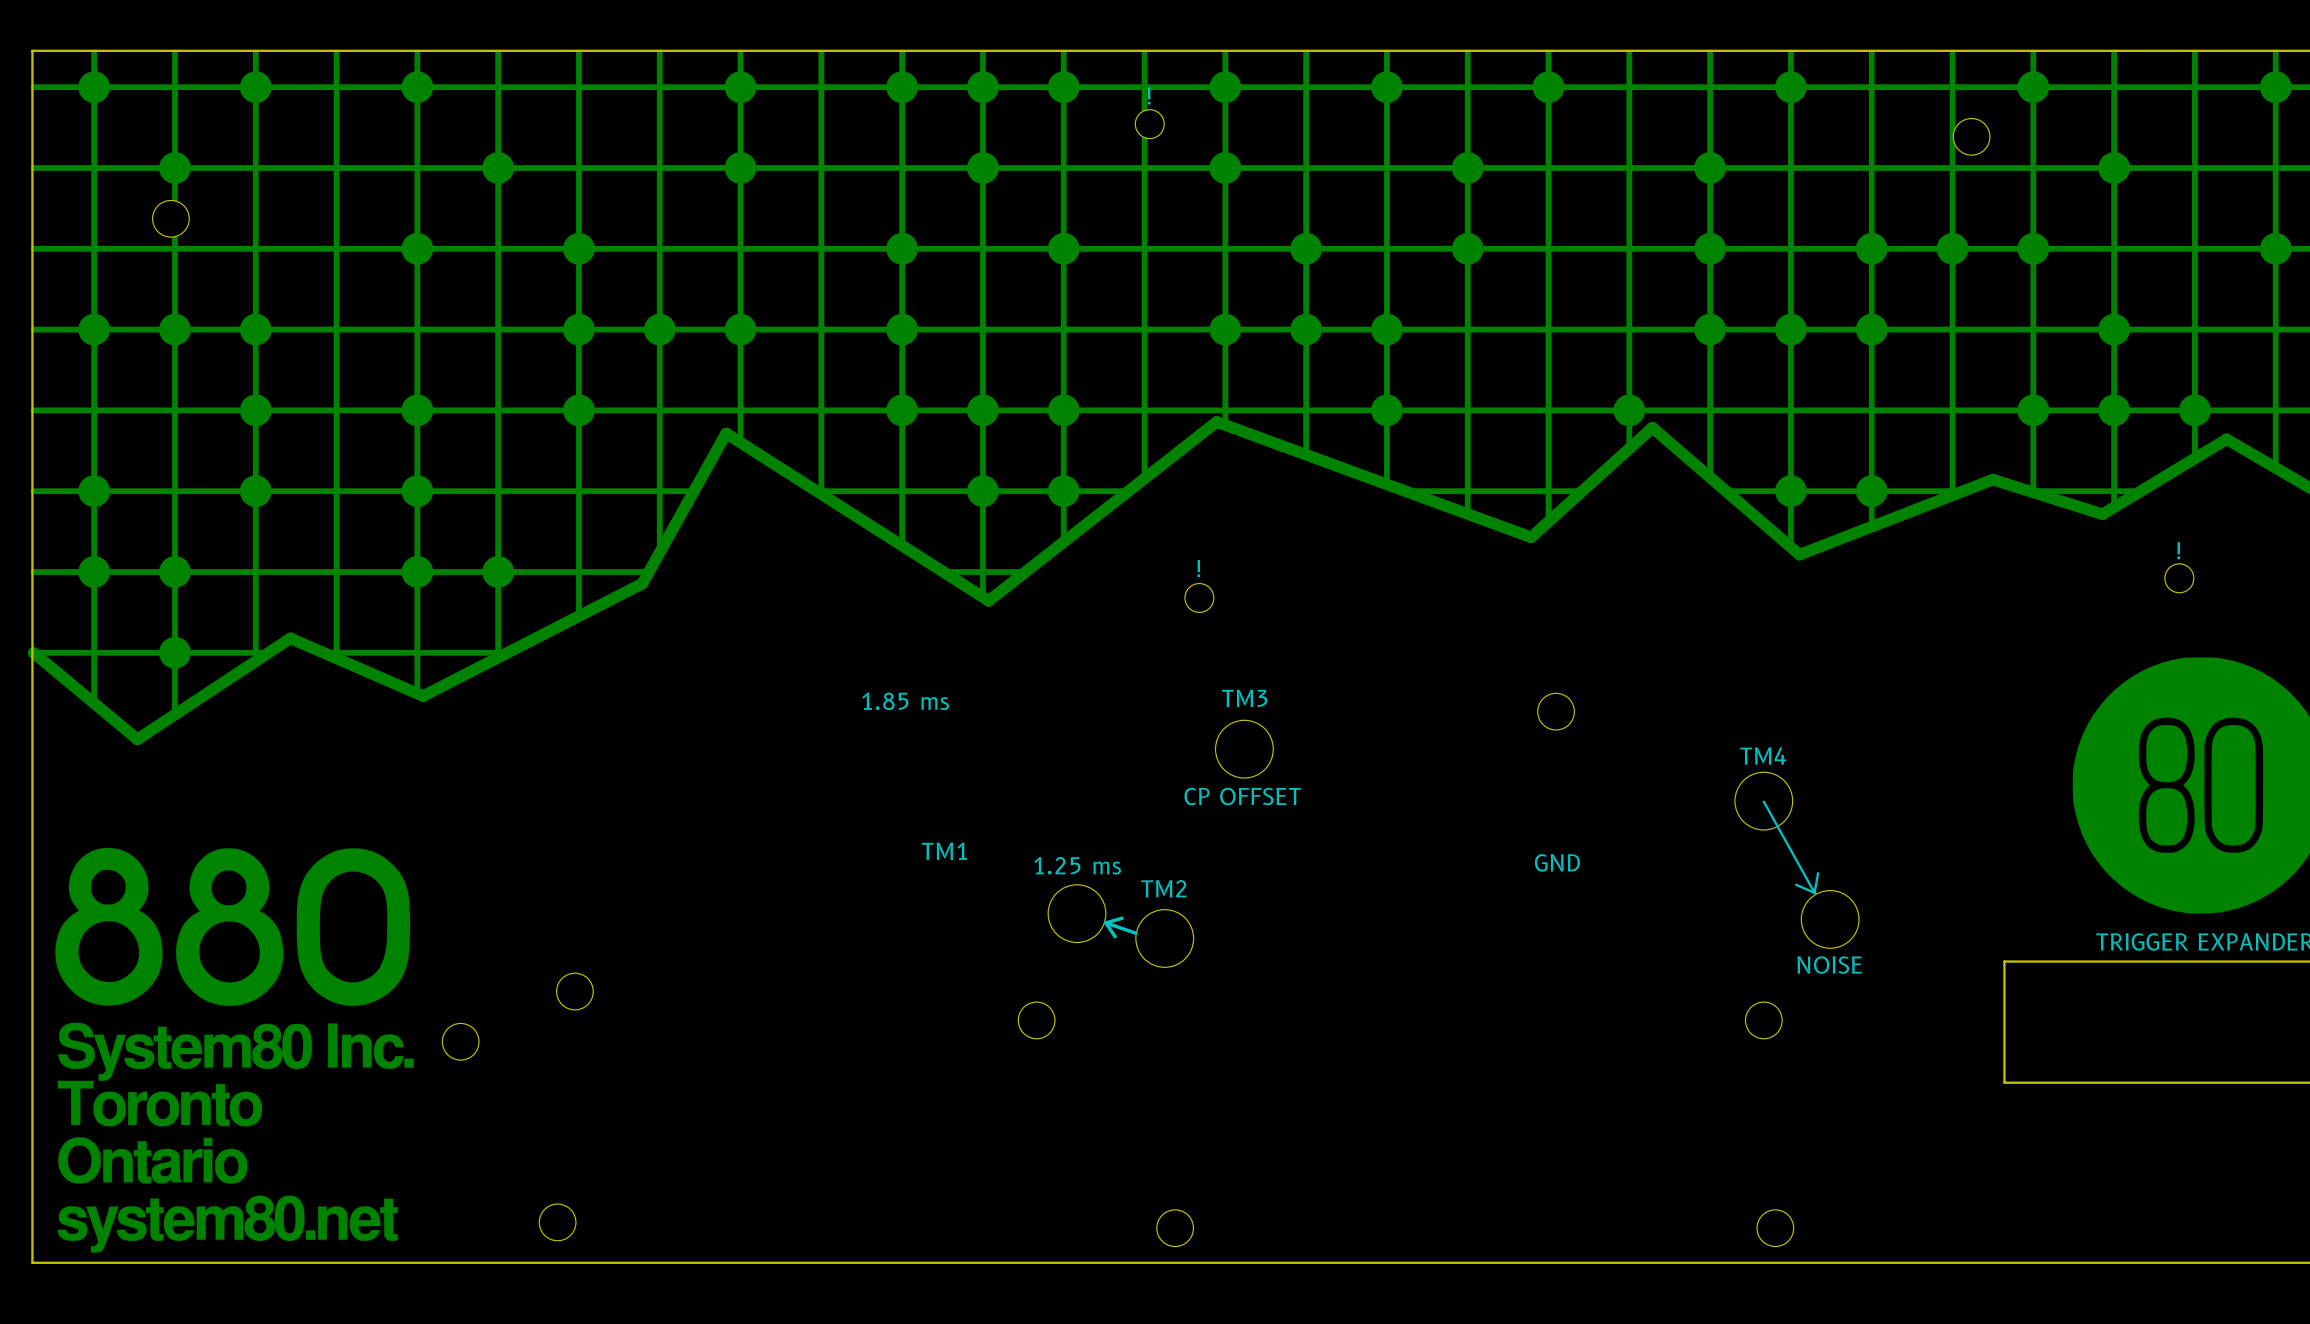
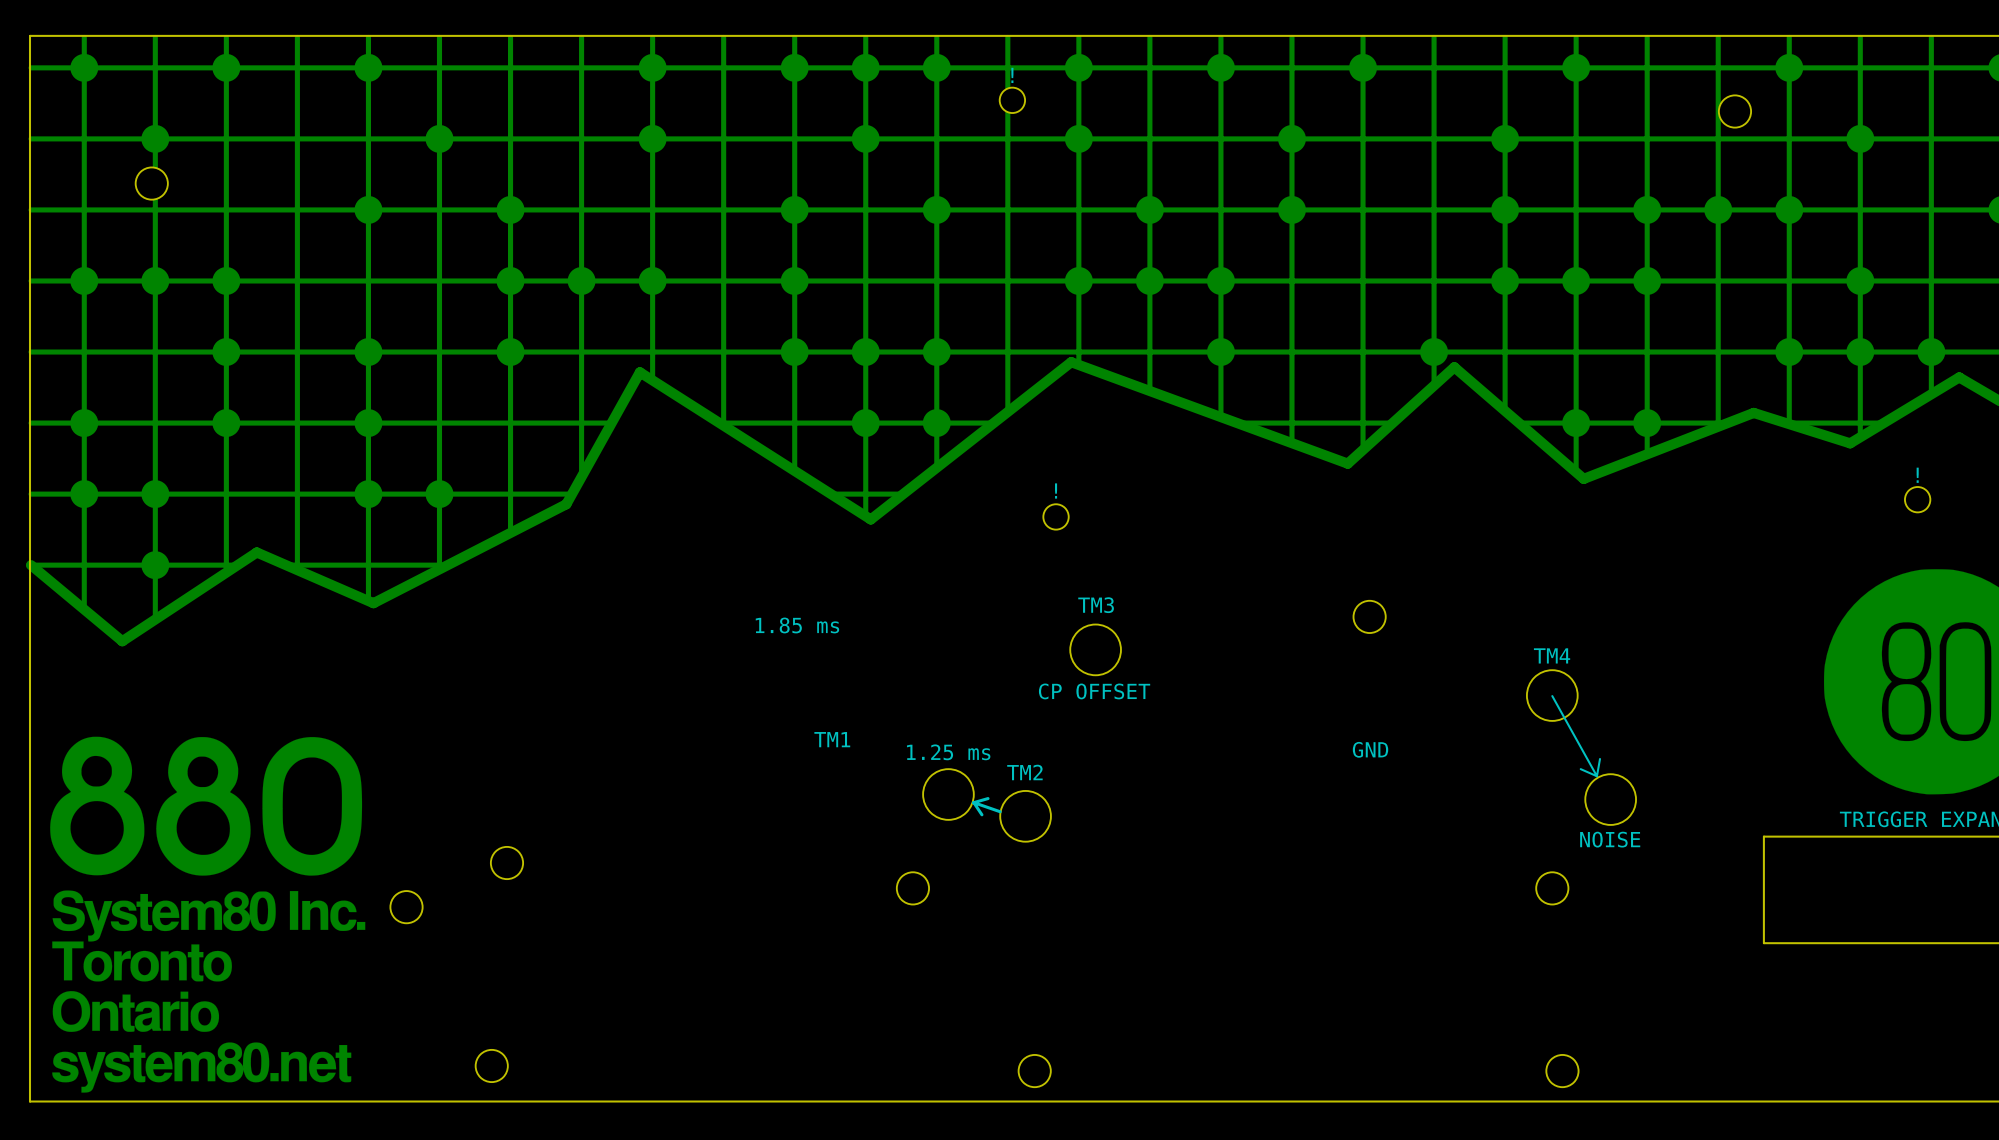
text position: 1.85 ms (905, 701) -> 1.85 ms (797, 625)

